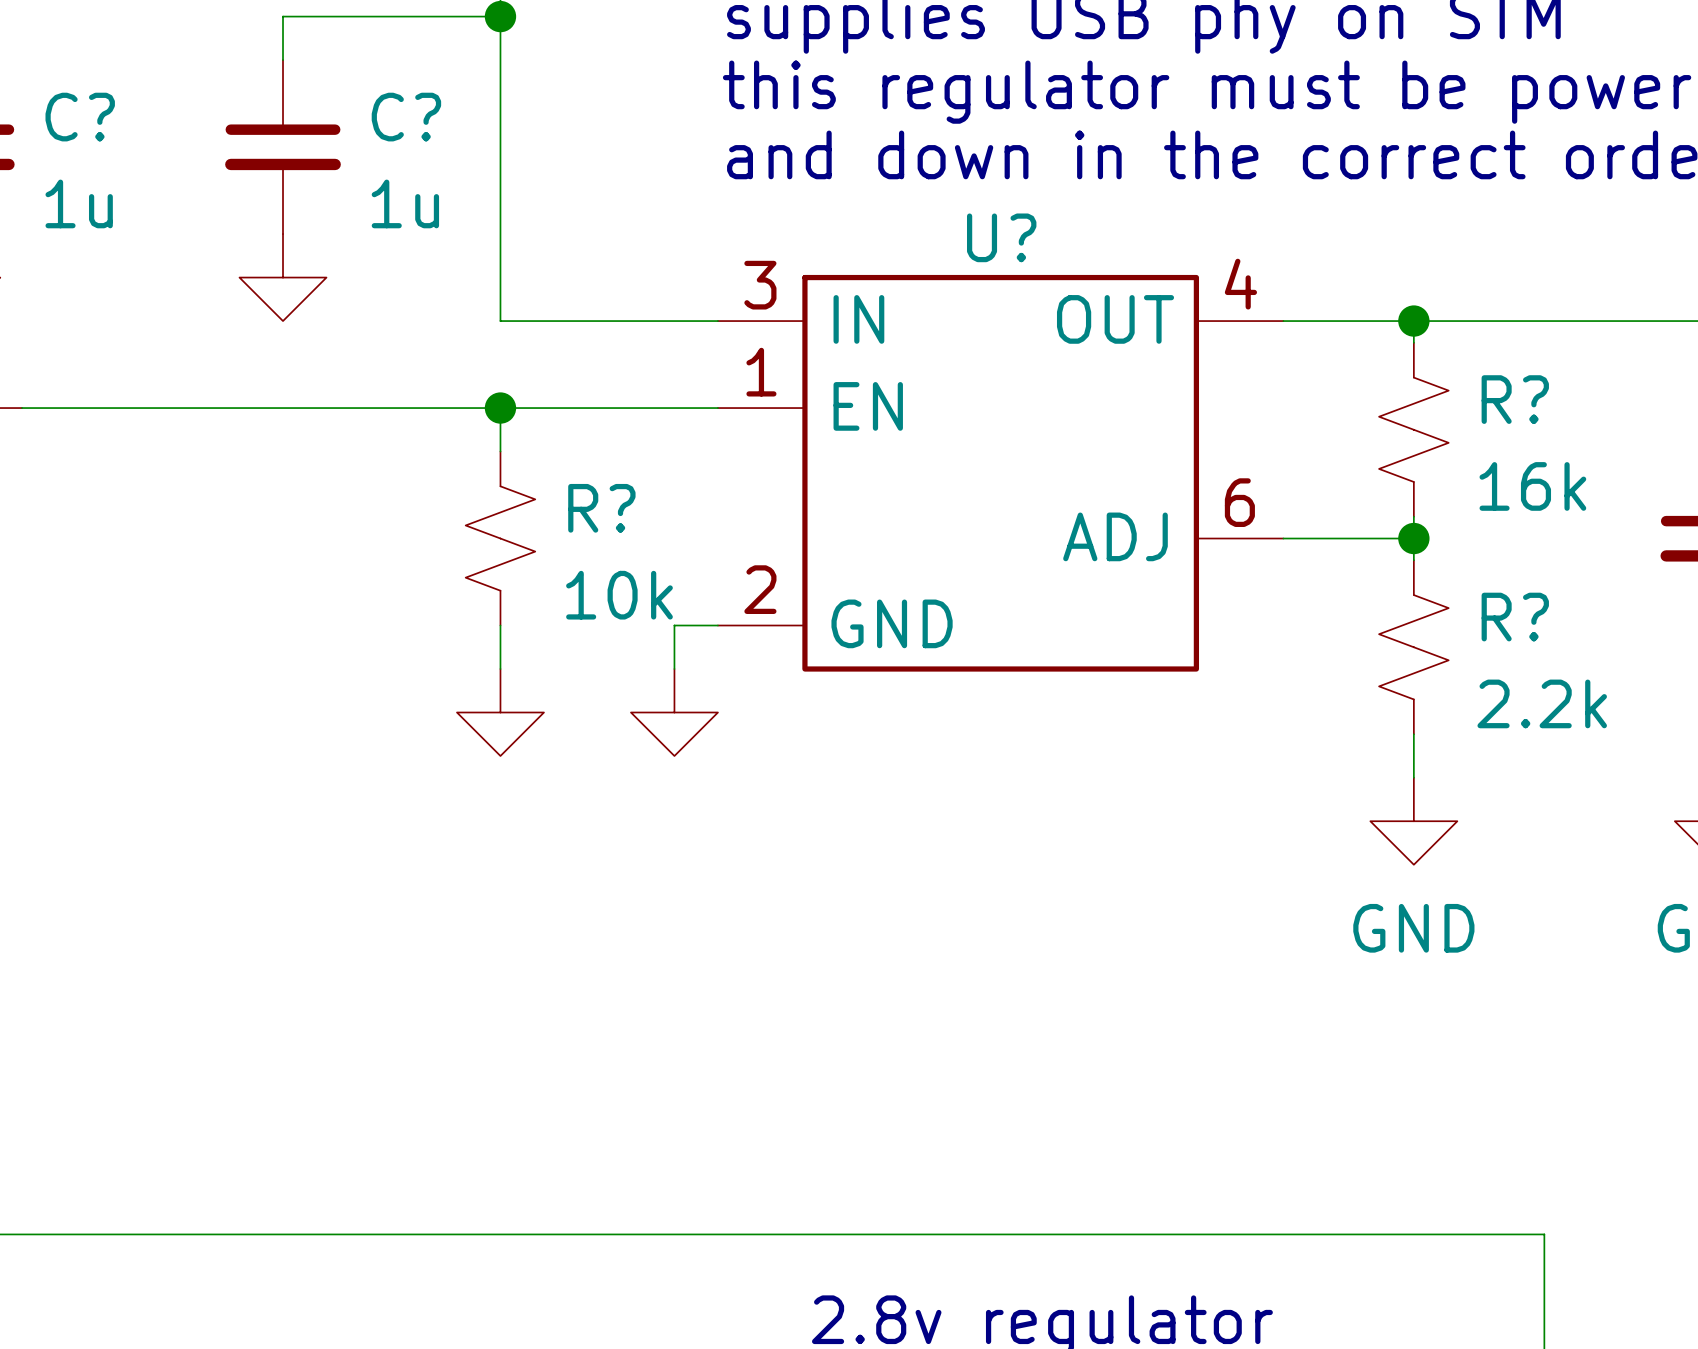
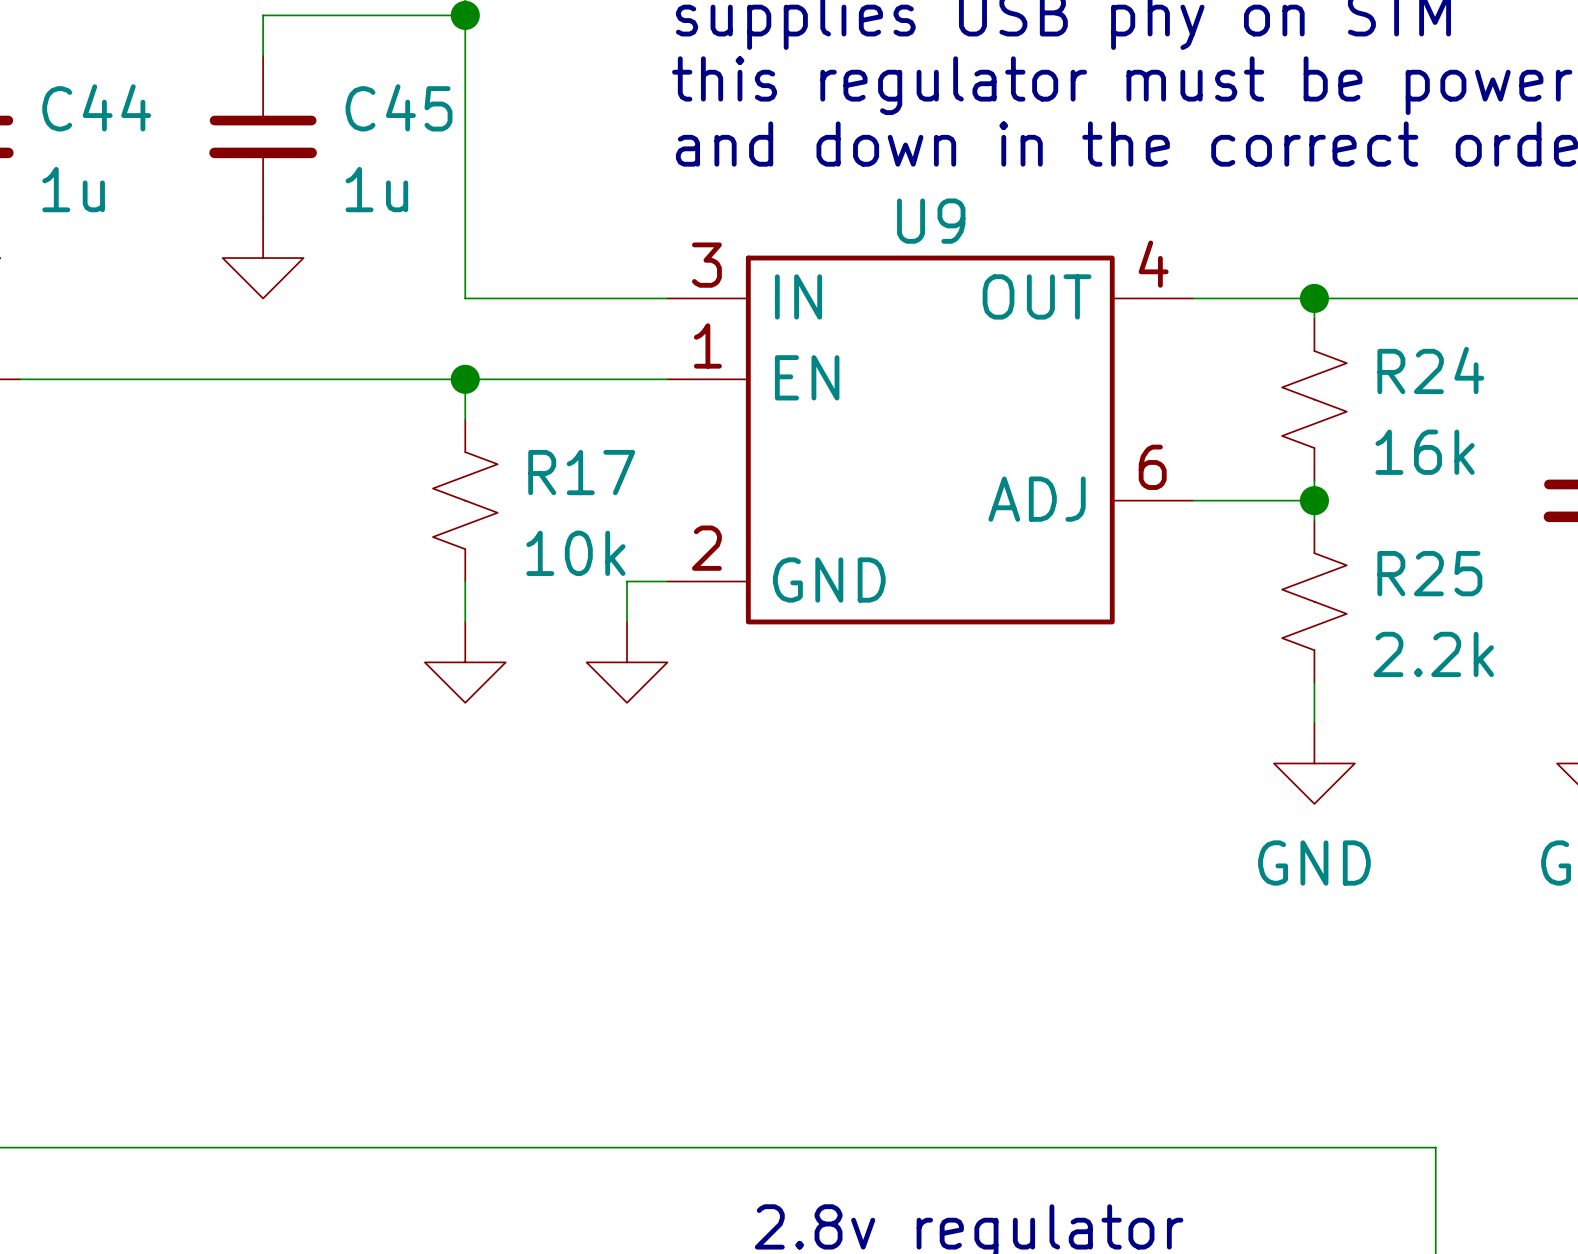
C? name: C? (80, 117) -> C44 (96, 107)
C? name: C? (406, 117) -> C45 (399, 107)
U? name: U? (1001, 237) -> U9 (931, 221)
R? name: R? (1515, 399) -> R24 (1430, 370)
R? name: R? (601, 508) -> R17 (581, 472)
R? name: R? (1515, 617) -> R25 (1429, 573)

